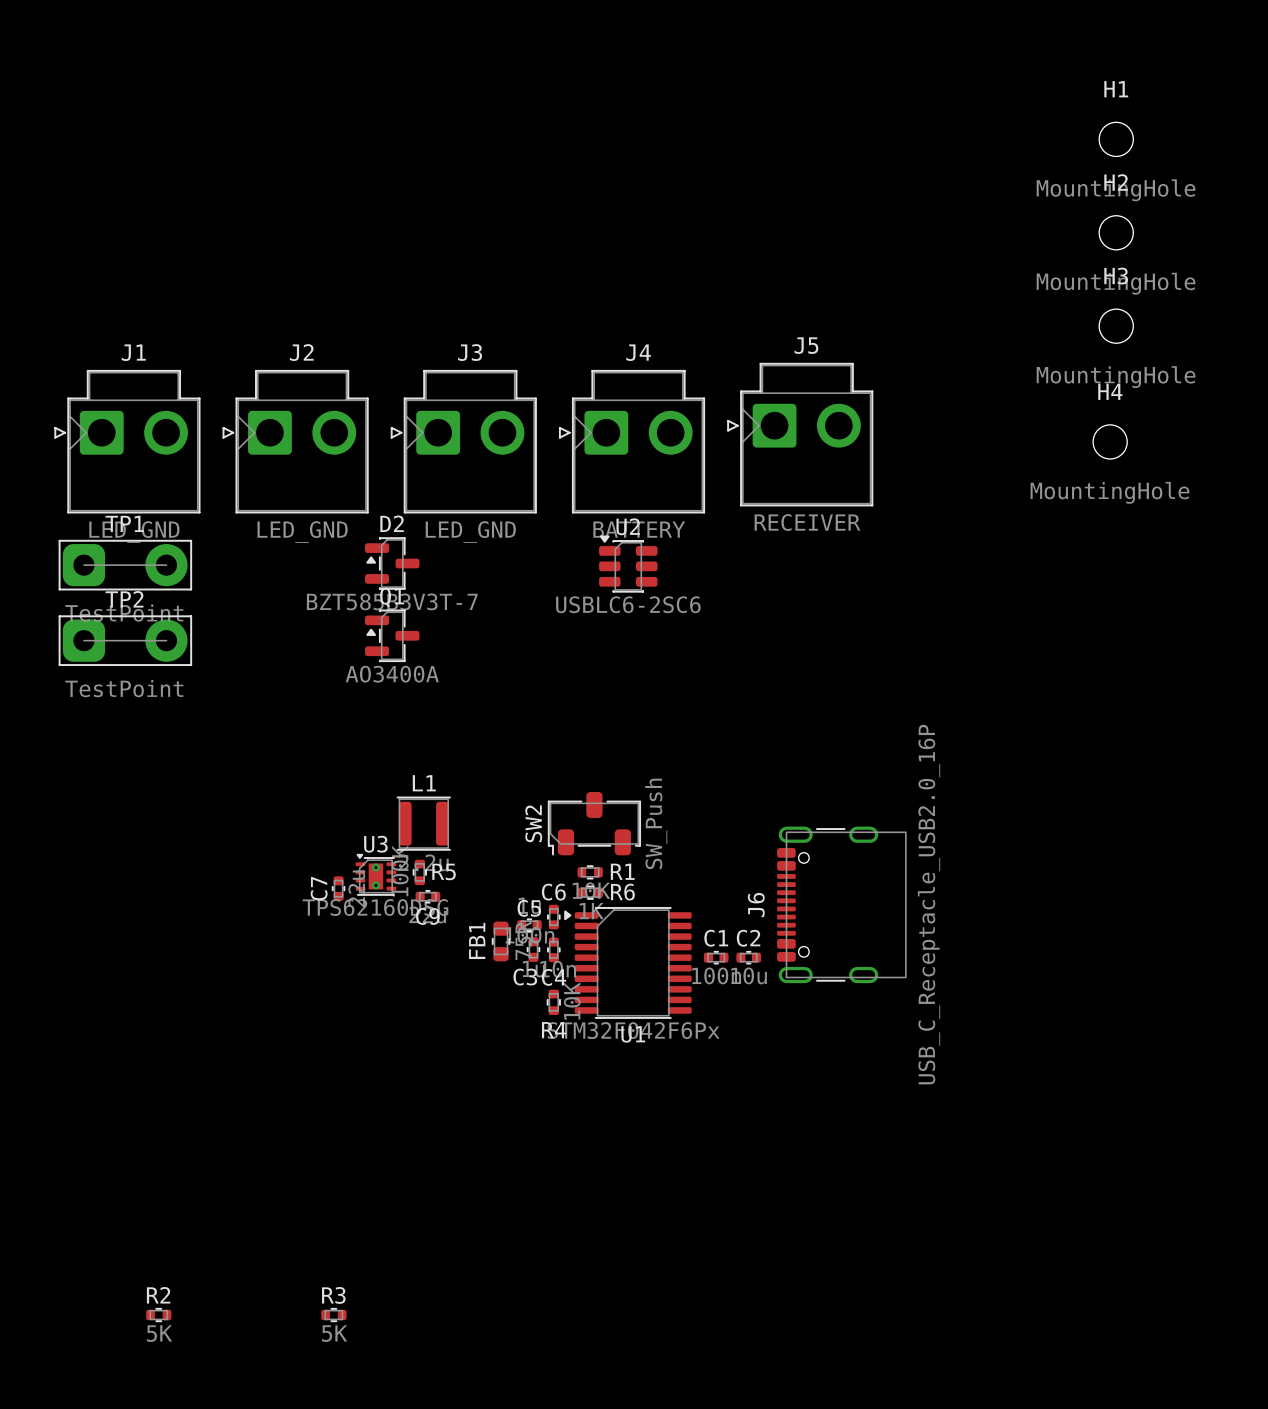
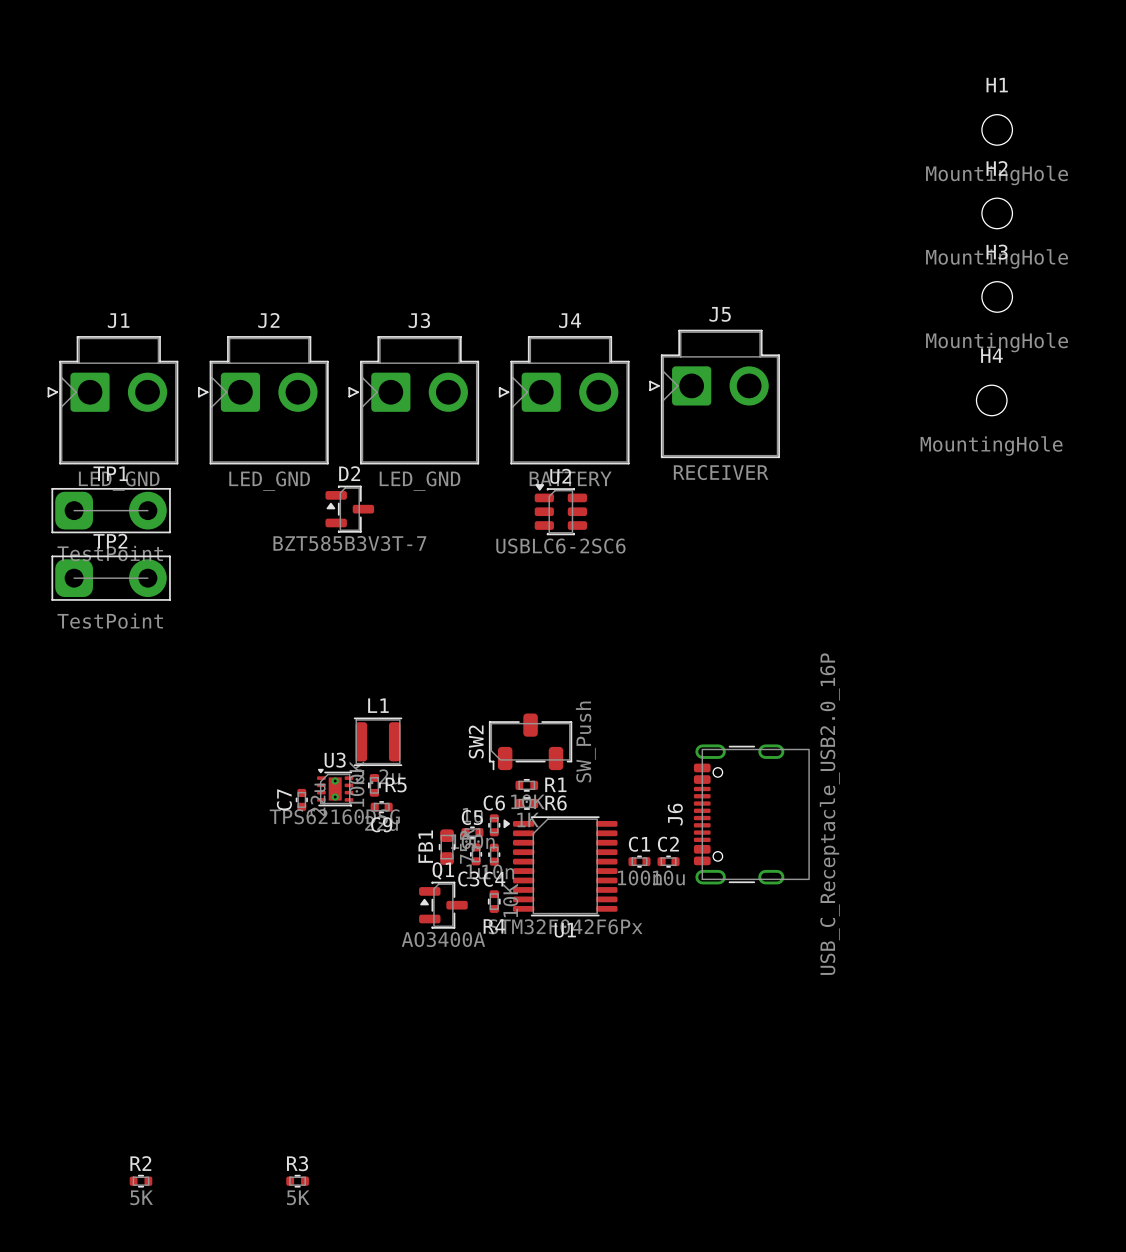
Q1 position: (392, 635) -> (443, 905)

